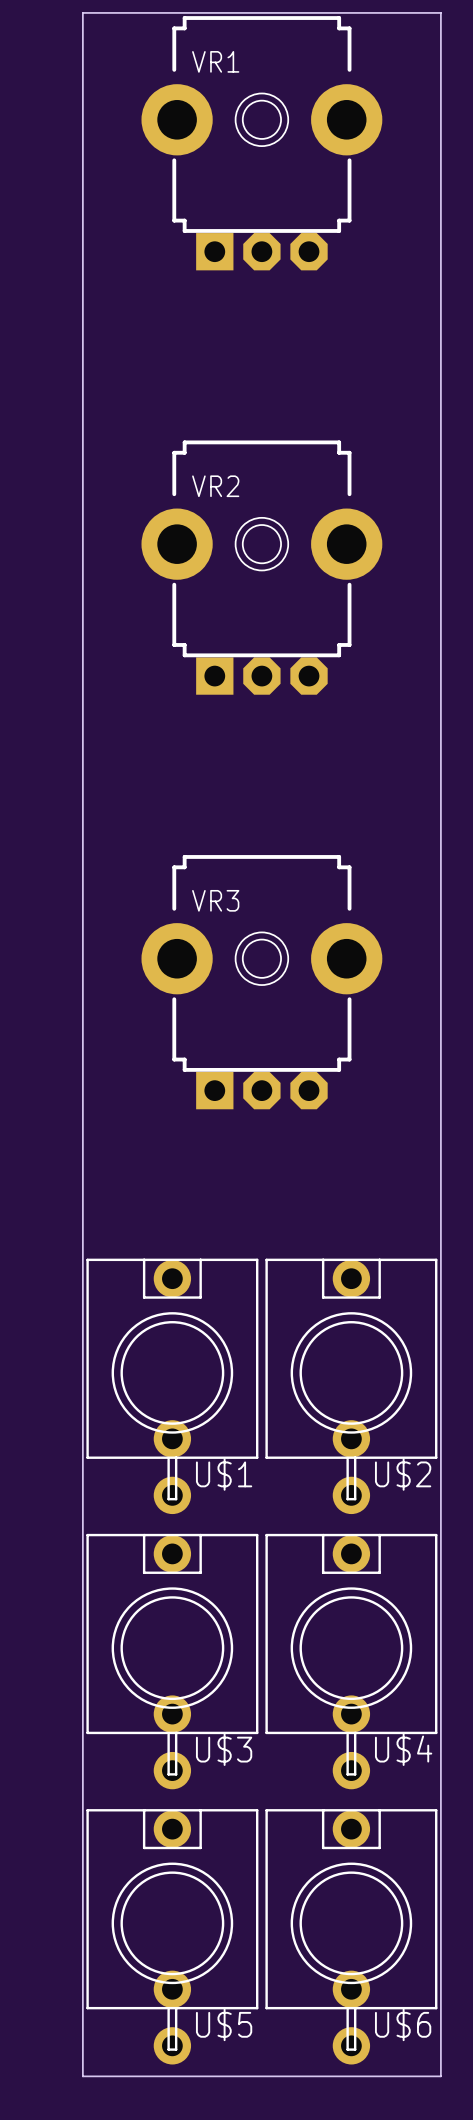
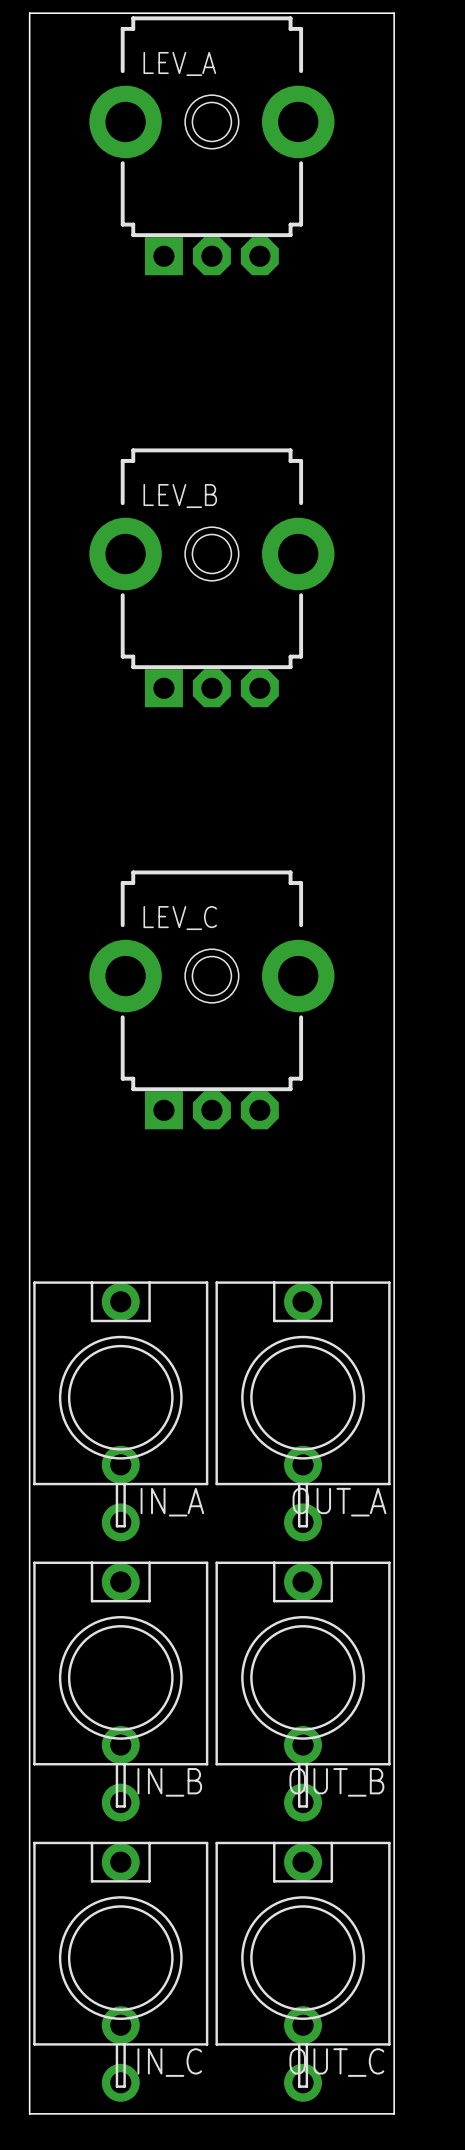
VR1 name: VR1 (215, 61) -> LEV_A (179, 63)
VR2 name: VR2 (215, 486) -> LEV_B (180, 496)
VR3 name: VR3 (215, 900) -> LEV_C (180, 918)
U$1 name: U$1 (224, 1474) -> IN_A (172, 1502)
U$2 name: U$2 (403, 1474) -> OUT_A (339, 1502)
U$3 name: U$3 (224, 1749) -> IN_B (169, 1782)
U$4 name: U$4 (403, 1749) -> OUT_B (336, 1782)
U$5 name: U$5 (224, 2024) -> IN_C (169, 2062)
U$6 name: U$6 (403, 2024) -> OUT_C (336, 2062)

